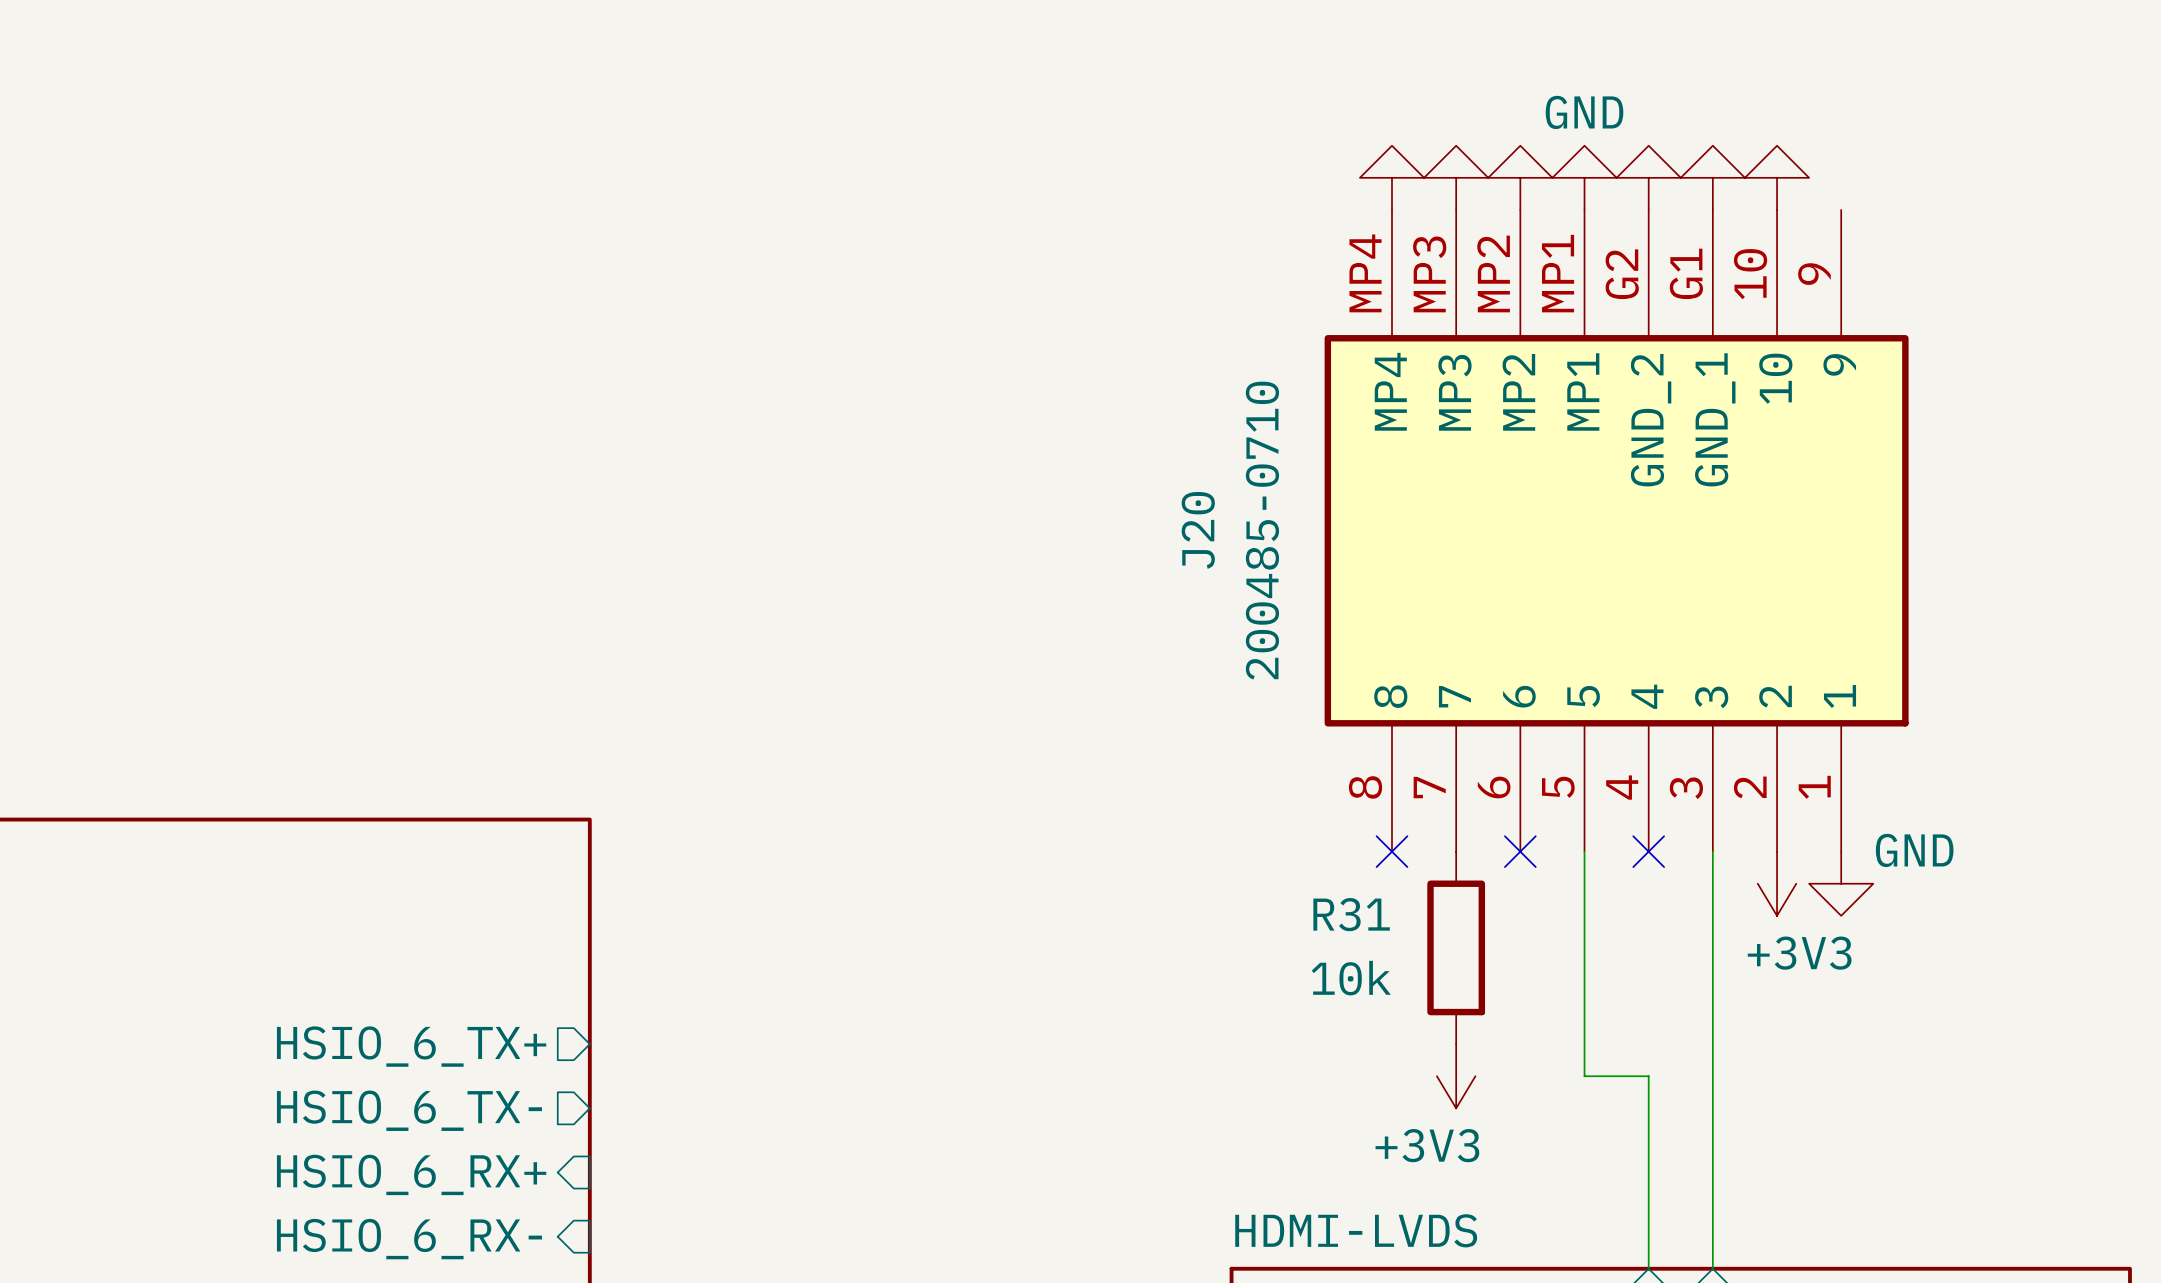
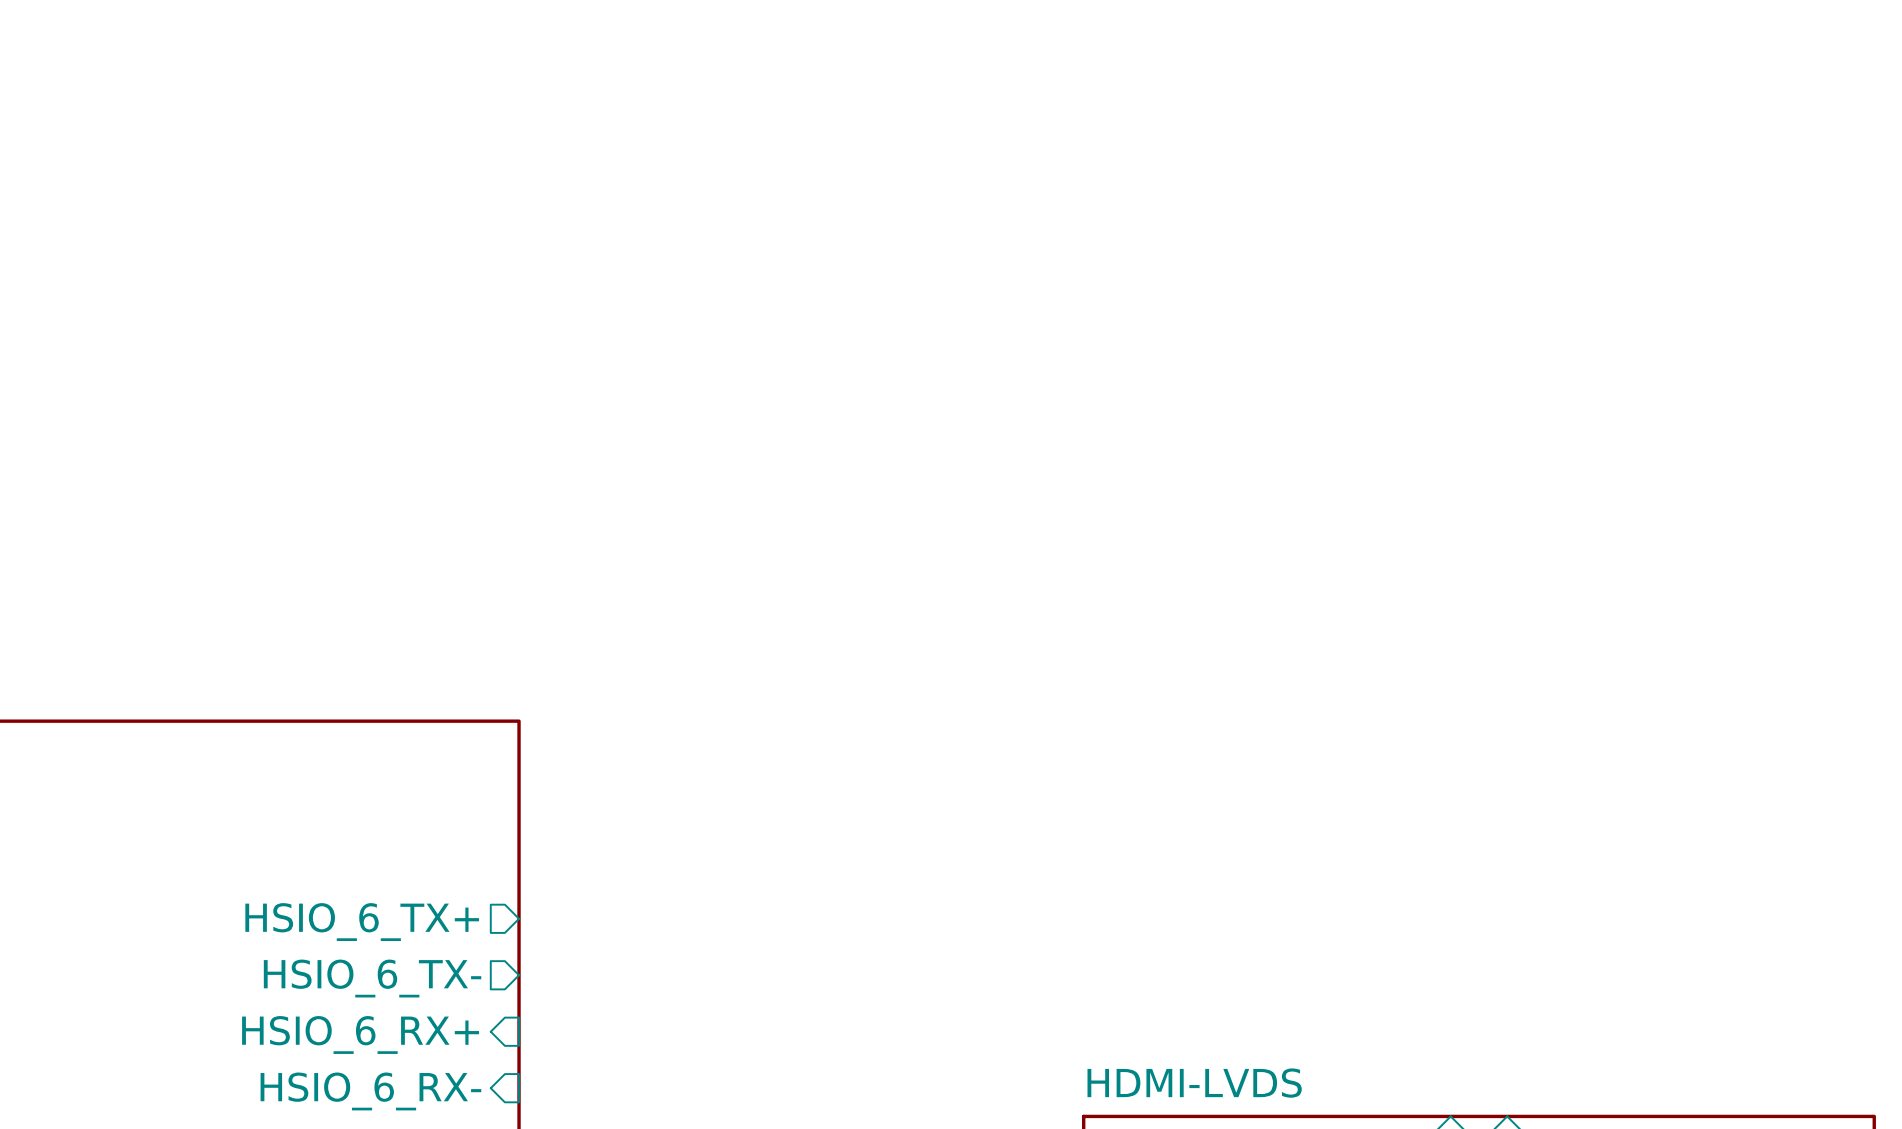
power symbol: (1391, 177) -> none
power symbol: (1456, 177) -> none
power symbol: (1520, 177) -> none
power symbol: (1584, 177) -> none
power symbol: (1648, 177) -> none
power symbol: GND (1712, 177) -> none
power symbol: (1777, 177) -> none
J20: 200485-0710 (1616, 530) -> none
no-connect mark: (1391, 851) -> none
no-connect mark: (1520, 851) -> none
wire: (1584, 851) (1584, 1076) (1648, 1076) (1648, 1268) -> none
no-connect mark: (1648, 851) -> none
wire: (1712, 851) (1712, 1268) -> none
power symbol: +3V3 (1777, 883) -> none
power symbol: GND (1841, 883) -> none
R31: 10k (1456, 947) -> none
power symbol: +3V3 (1456, 1076) -> none

